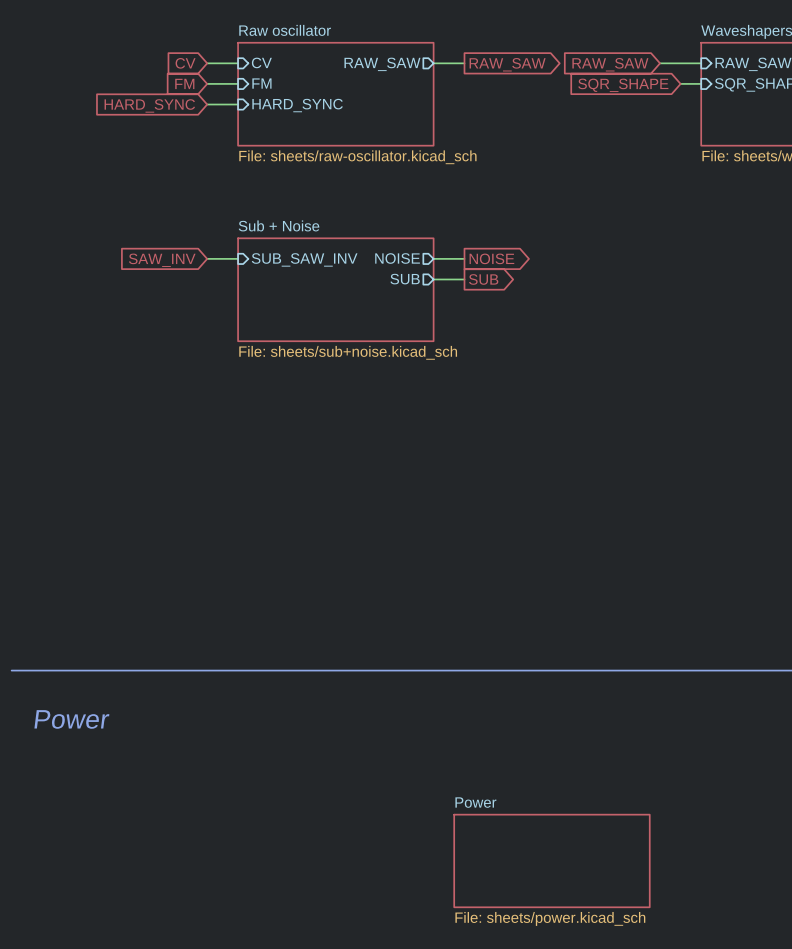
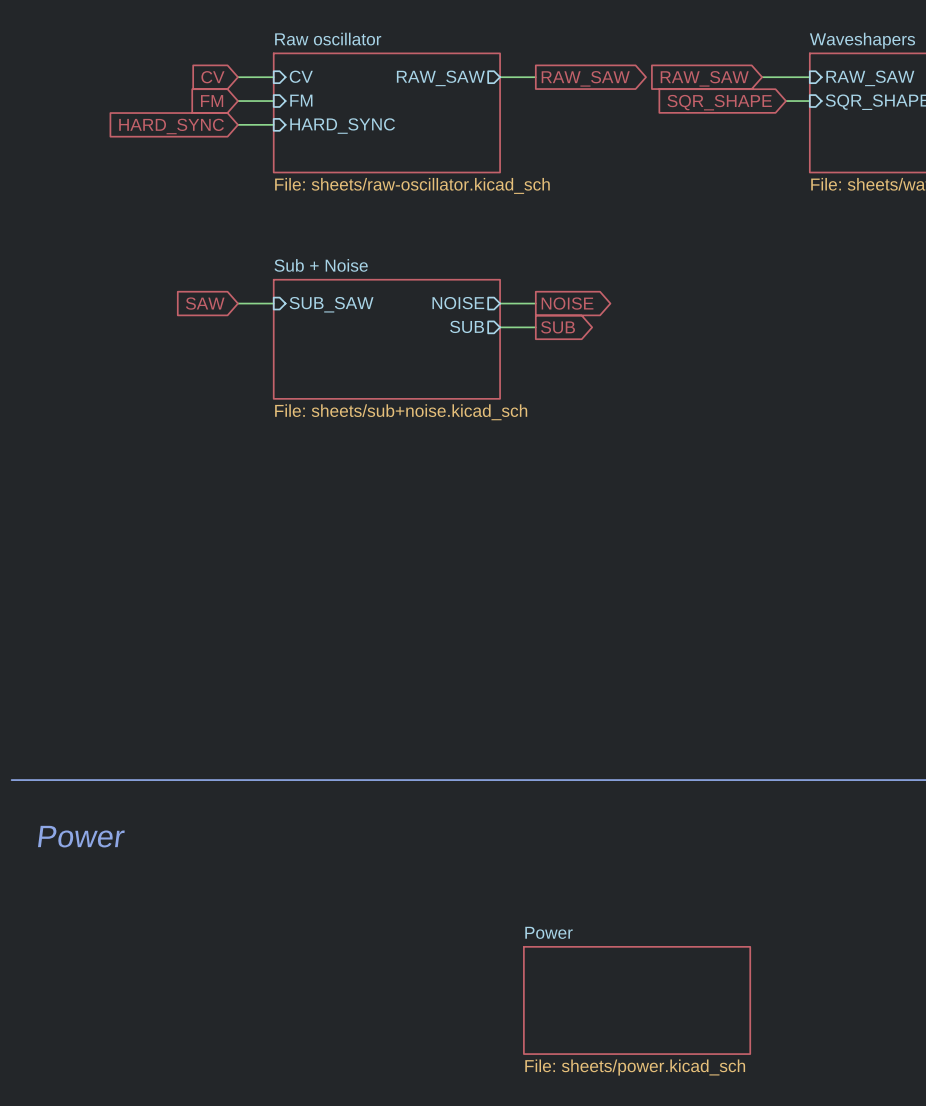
sheet pin: SUB_SAW_INV (304, 259) -> SUB_SAW (331, 304)
global label: SAW_INV (162, 260) -> SAW (205, 303)

